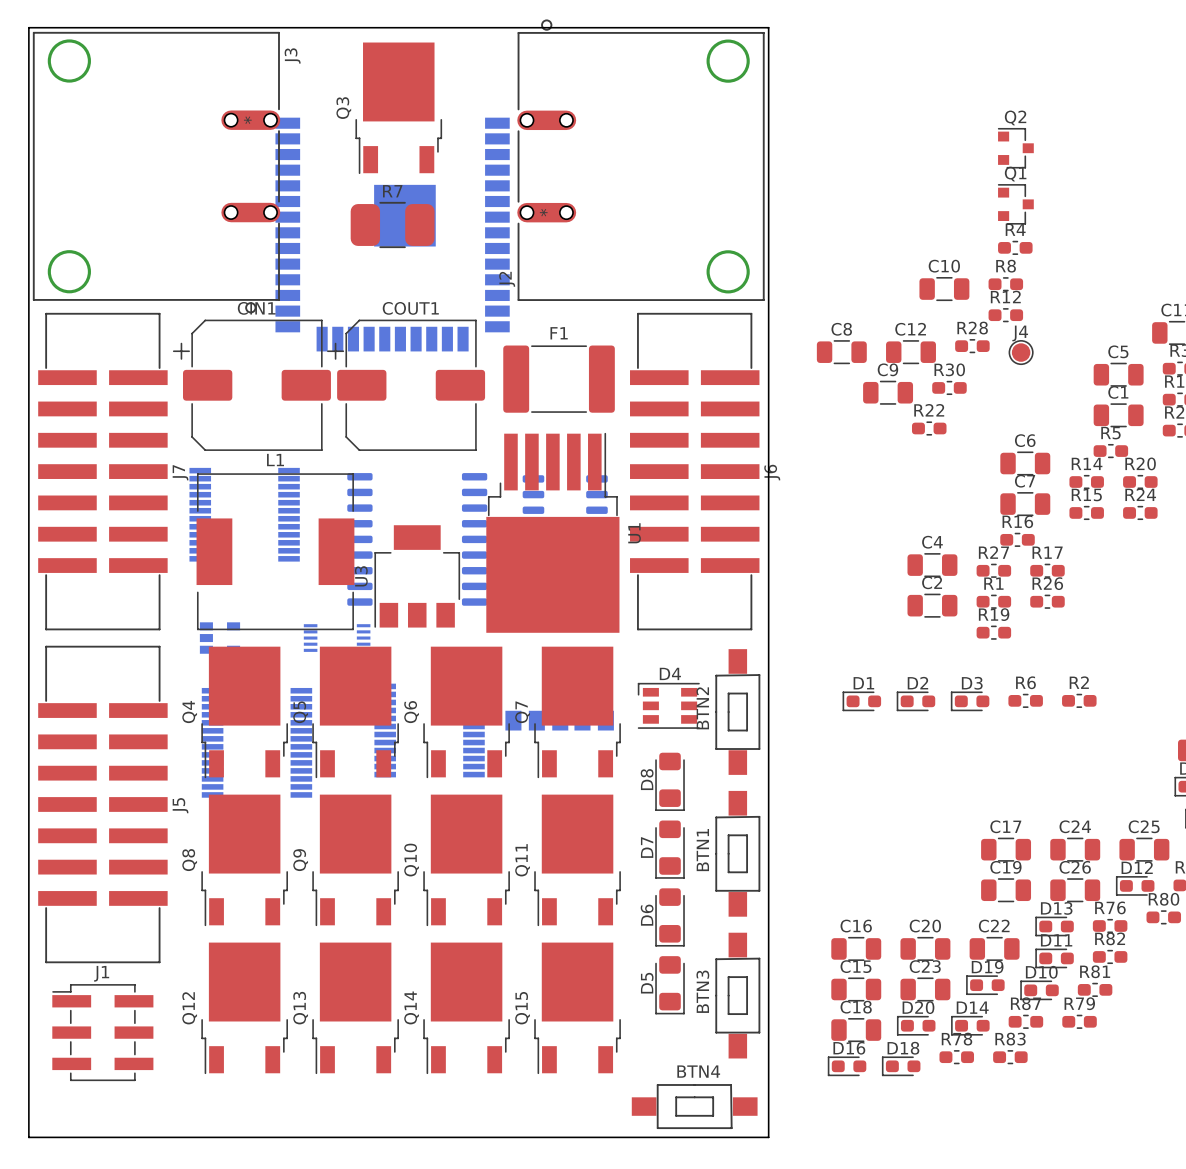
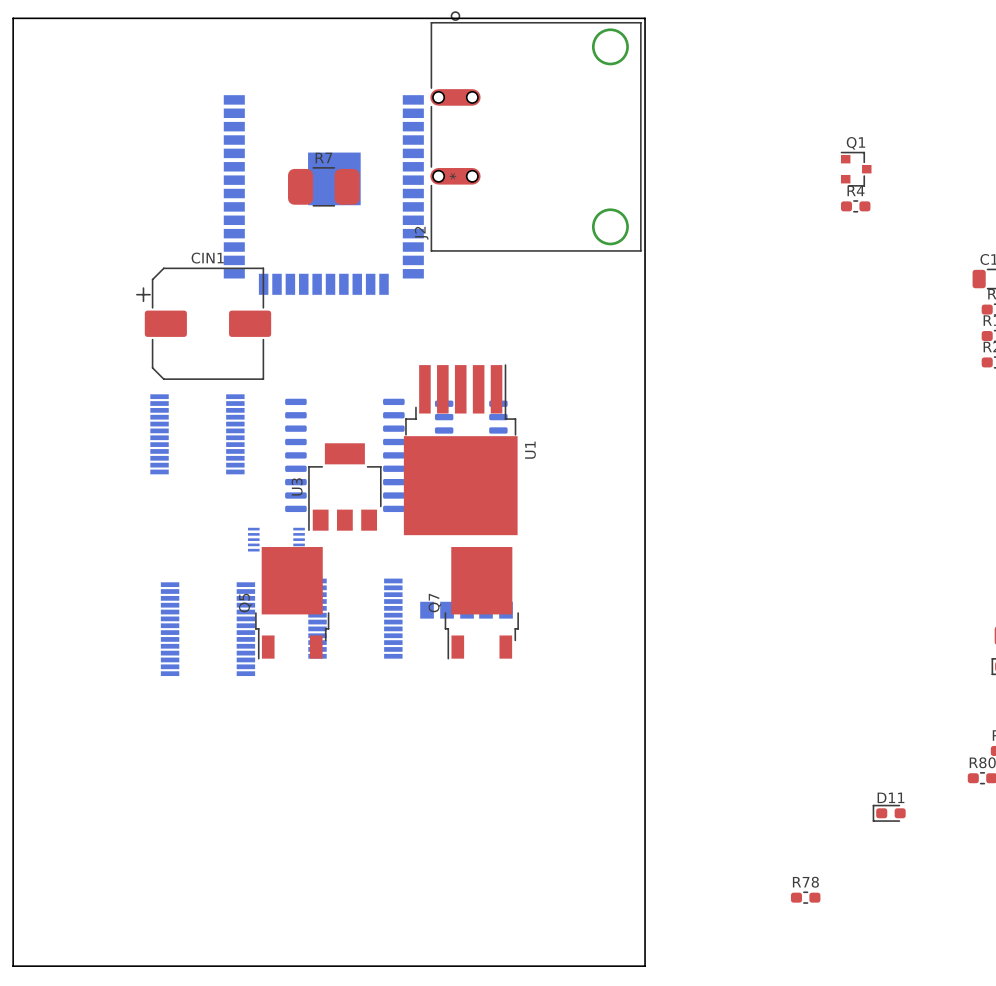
Q3: (398, 108) -> none
Q2: (1015, 148) -> none
J3: (156, 172) -> none
R8: (1005, 284) -> none
C10: (944, 289) -> none
R12: (1005, 315) -> none
R28: (972, 346) -> none
C8: (841, 352) -> none
C12: (911, 352) -> none
J4: (1021, 352) -> none
C5: (1118, 374) -> none
F1: (559, 379) -> none
COUT1: (406, 385) -> none
R30: (949, 387) -> none
C9: (888, 392) -> none
C1: (1118, 415) -> none
R22: (929, 428) -> none
R5: (1110, 451) -> none
C6: (1025, 463) -> none
J7: (102, 471) -> none
J6: (694, 471) -> none
R14: (1086, 482) -> none
R20: (1140, 482) -> none
C7: (1025, 504) -> none
R15: (1086, 512) -> none
R24: (1140, 512) -> none
R16: (1017, 539) -> none
L1: (275, 551) -> none
C4: (932, 565) -> none
R27: (993, 570) -> none
R17: (1047, 570) -> none
R1: (993, 601) -> none
R26: (1047, 601) -> none
C2: (932, 605) -> none
R19: (993, 632) -> none
part: (219, 638) -> none
R6: (1025, 700) -> none
R2: (1079, 700) -> none
D1: (861, 701) -> none
D2: (915, 701) -> none
D3: (970, 701) -> none
D4: (668, 705) -> none
Q4: (244, 712) -> none
Q6: (466, 712) -> none
BTN2: (737, 712) -> none
D8: (670, 781) -> none
J5: (102, 804) -> none
D7: (670, 849) -> none
C17: (1006, 849) -> none
C24: (1075, 849) -> none
C25: (1144, 849) -> none
BTN1: (737, 853) -> none
Q8: (244, 860) -> none
Q9: (355, 860) -> none
Q10: (466, 860) -> none
Q11: (577, 860) -> none
D12: (1135, 885) -> none
C19: (1006, 890) -> none
C26: (1075, 890) -> none
D6: (670, 917) -> none
D13: (1054, 926) -> none
R76: (1110, 926) -> none
C16: (856, 948) -> none
C20: (925, 948) -> none
C22: (994, 948) -> none
R82: (1110, 956) -> none
D5: (670, 985) -> none
D19: (985, 985) -> none
C15: (856, 989) -> none
C23: (925, 989) -> none
R81: (1095, 989) -> none
D10: (1039, 990) -> none
BTN3: (737, 995) -> none
Q12: (244, 1008) -> none
Q13: (355, 1008) -> none
Q14: (466, 1008) -> none
Q15: (577, 1008) -> none
R87: (1025, 1021) -> none
R79: (1079, 1021) -> none
D20: (916, 1025) -> none
D14: (970, 1025) -> none
C18: (856, 1030) -> none
J1: (102, 1032) -> none
R83: (1010, 1057) -> none
D16: (847, 1066) -> none
D18: (901, 1066) -> none
BTN4: (694, 1106) -> none

